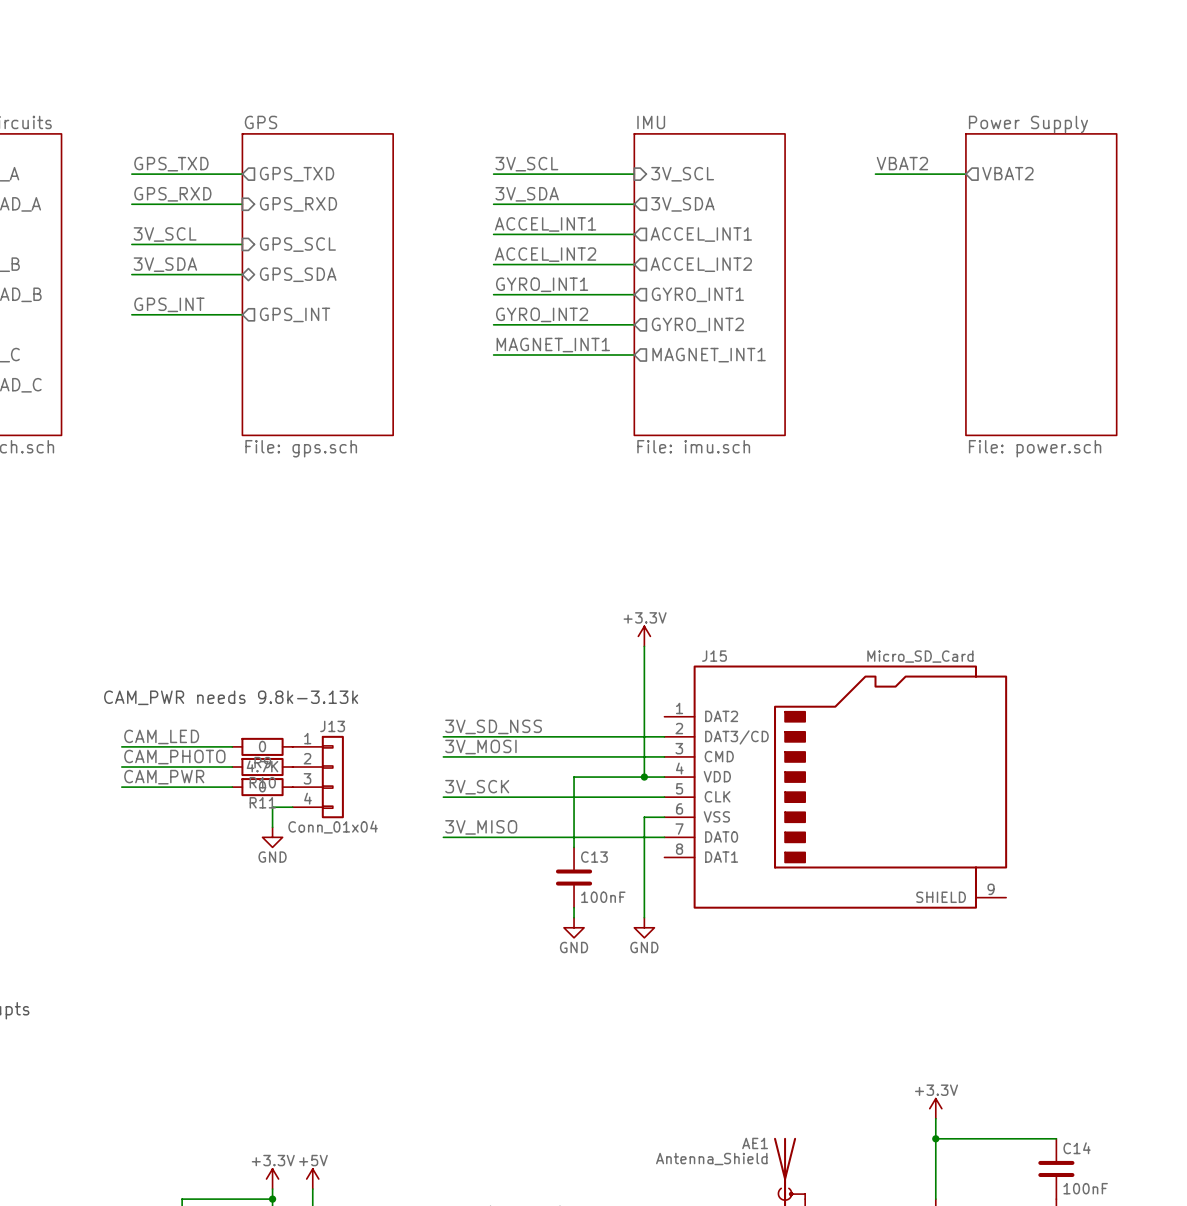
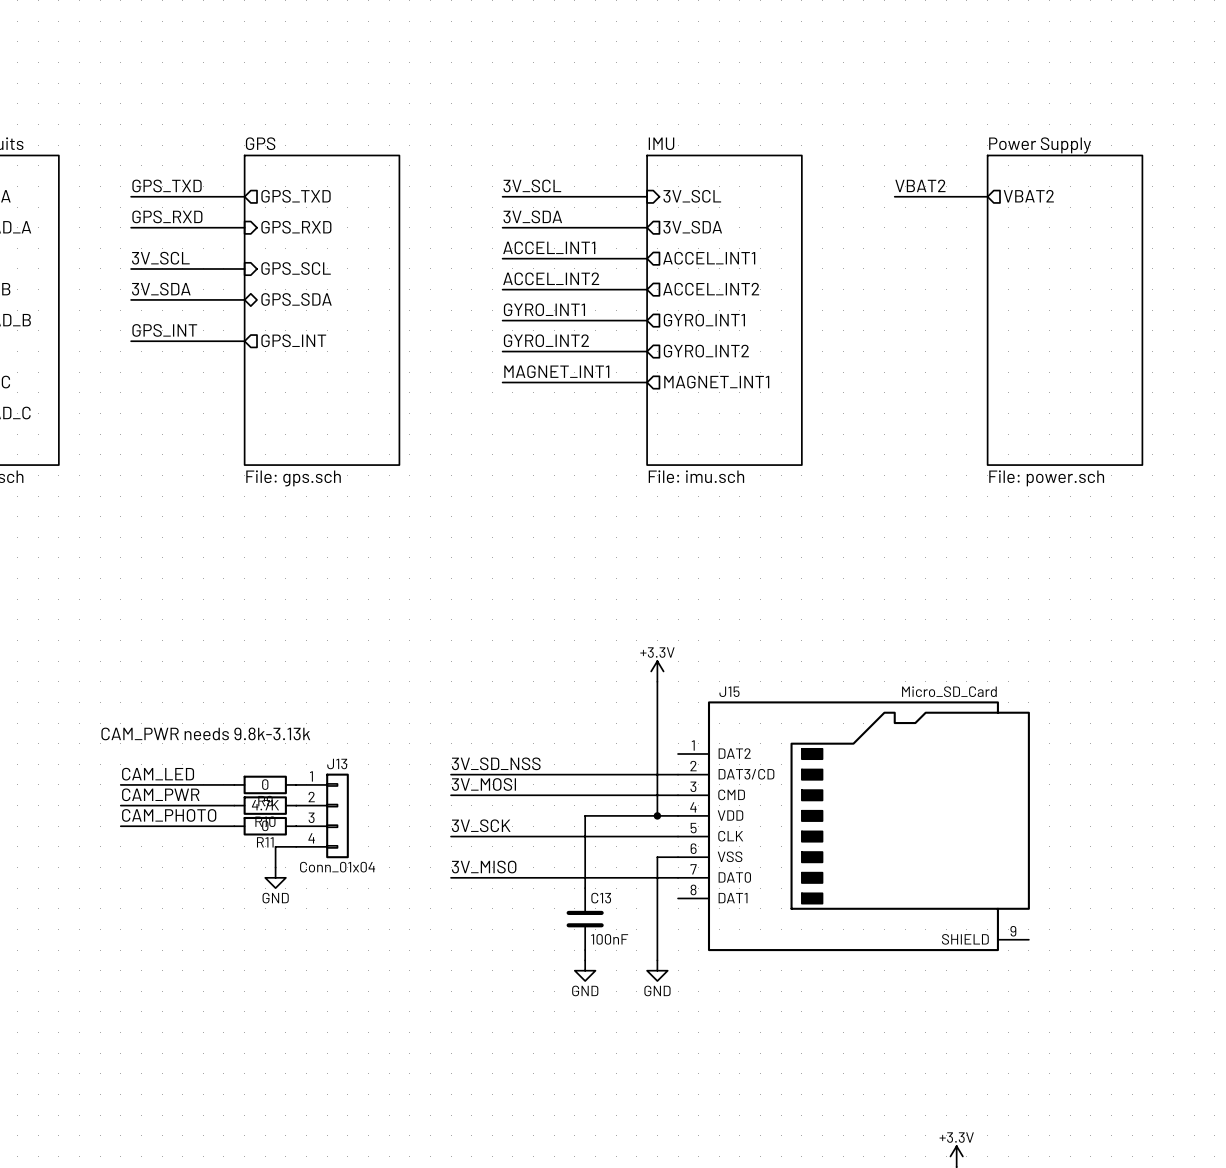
label: CAM_PHOTO (174, 757) -> CAM_PWR (160, 794)
label: CAM_PWR (164, 777) -> CAM_PHOTO (169, 815)

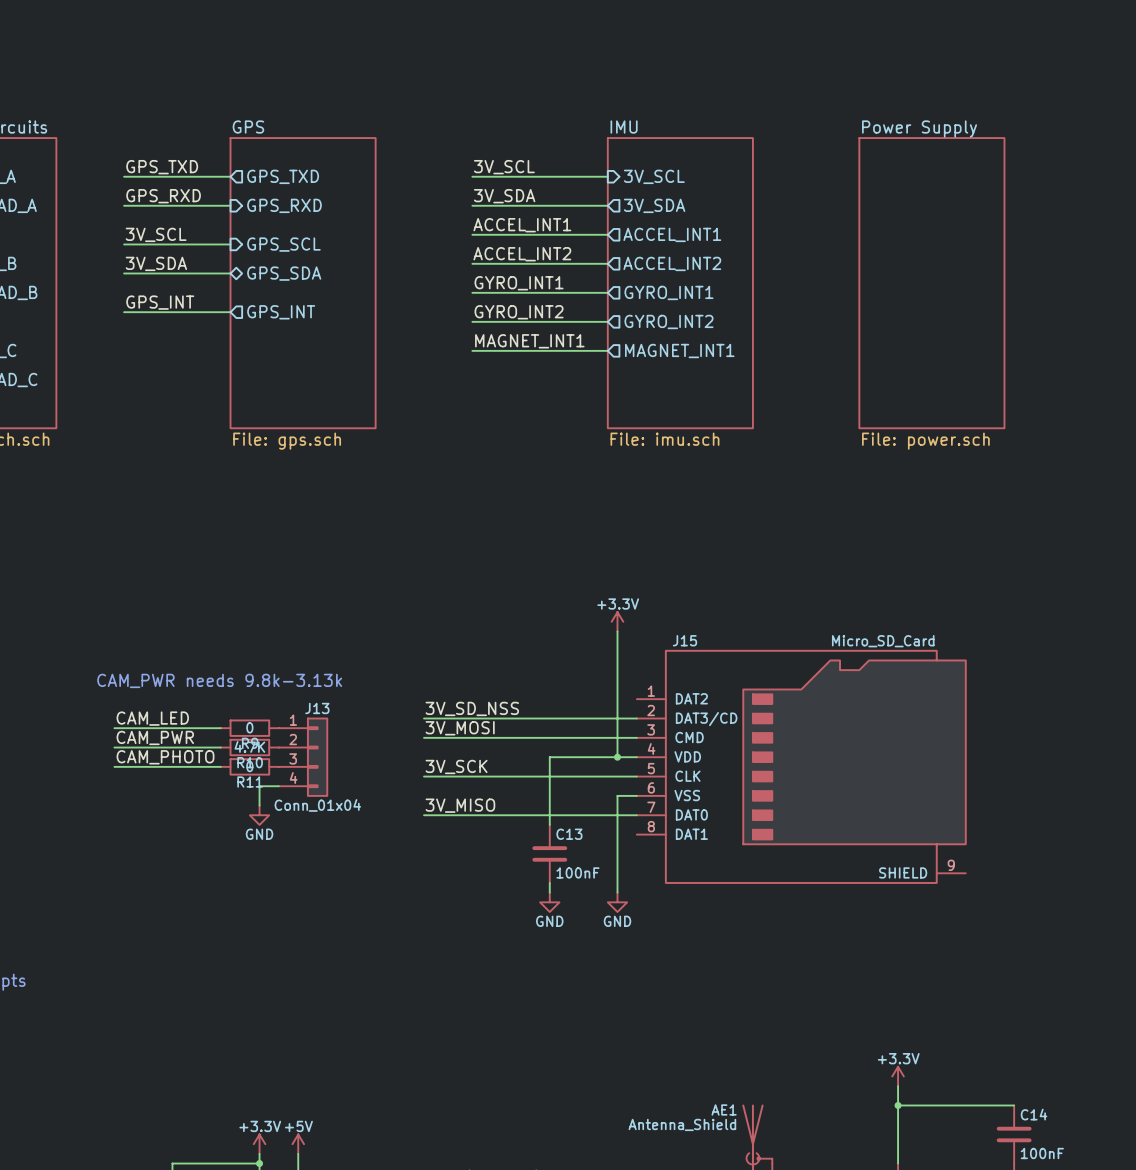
label: VBAT2 (920, 185) -> none
wire: (894, 196) (987, 196) -> none
sheet pin: VBAT2 (1028, 196) -> none
sheet Power Supply position: (1065, 310) -> (931, 283)

